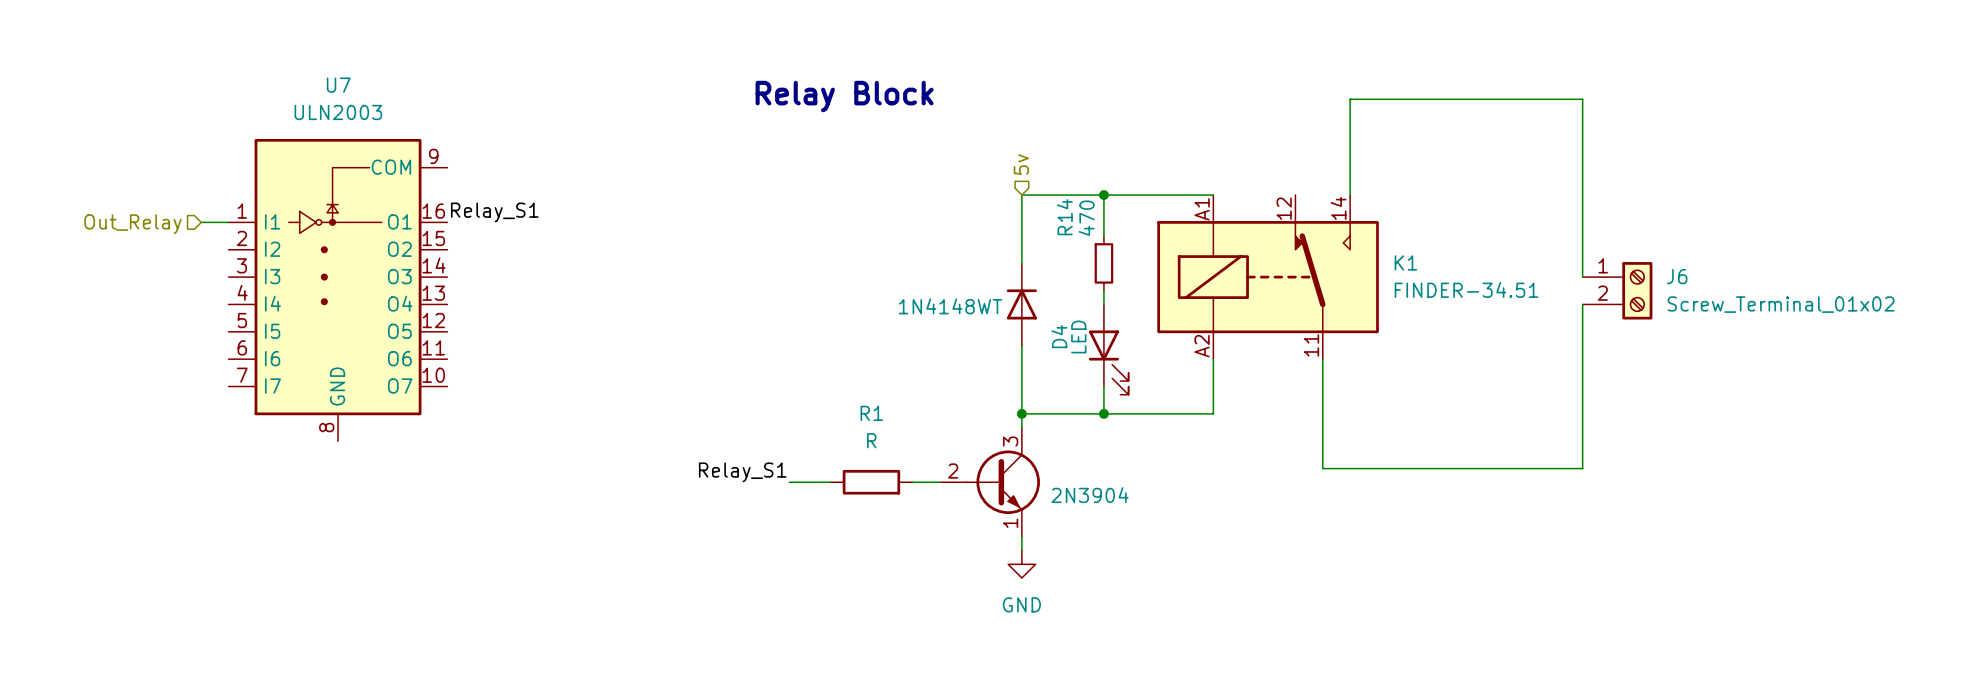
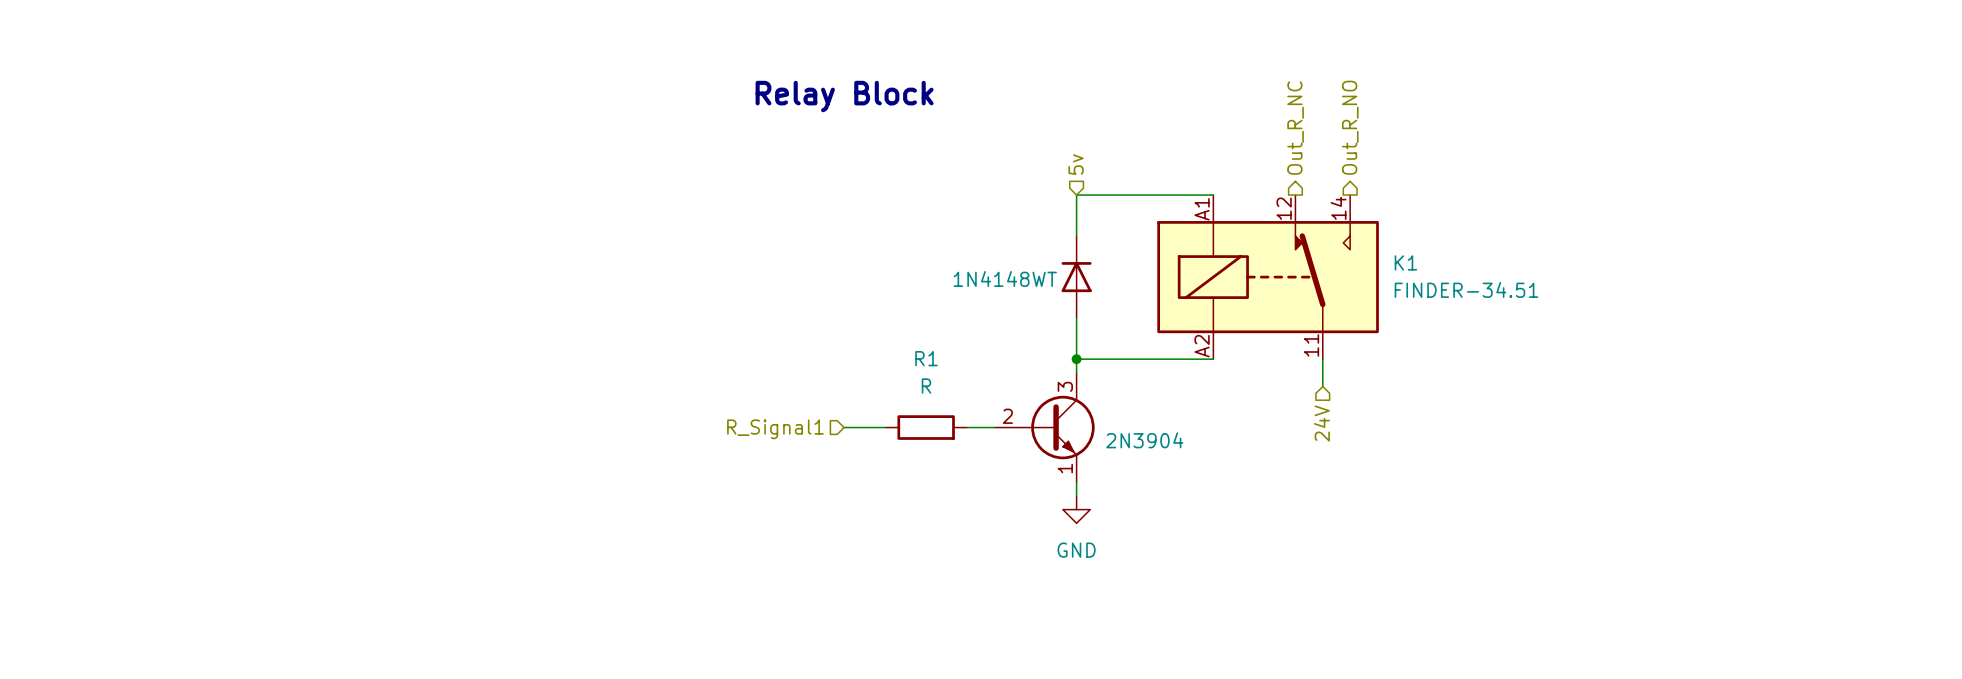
hierarchical label: none -> Out_R_NO (1350, 127)
hierarchical label: none -> Out_R_NC (1295, 128)
hierarchical label position: 5v (1021, 164) -> 5v (1076, 164)
wire: (1076, 195) (1021, 195) (1021, 263) -> (1076, 195) (1076, 236)
wire: (1103, 195) (1103, 236) -> none
junction: (1103, 195) -> none
wire: (1350, 195) (1350, 99) (1582, 99) (1582, 277) -> none
label: Relay_S1 (494, 212) -> none
wire: (201, 222) (228, 222) -> none
hierarchical label: Out_Relay (132, 224) -> none
R14: 470 (1103, 263) -> none
U7: ULN2003 (338, 290) -> none
wire: (1103, 290) (1103, 304) -> none
J6: Screw_Terminal_01x02 (1617, 290) -> none
part position: (1021, 304) -> (1076, 277)
wire: (1582, 304) (1582, 468) (1322, 468) (1322, 386) -> none
wire: none -> (1076, 318) (1076, 372)
wire: (1021, 345) (1021, 427) -> none
D4: LED (1108, 349) -> none
junction: none -> (1076, 359)
wire: (1213, 359) (1213, 413) (1021, 413) -> (1213, 359) (1076, 359)
wire: (1103, 386) (1103, 413) -> none
junction: (1021, 413) -> none
junction: (1103, 413) -> none
hierarchical label: none -> 24V (1321, 423)
hierarchical label: none -> R_Signal1 (775, 429)
label: Relay_S1 (742, 472) -> none
wire: (789, 482) (830, 482) -> (844, 427) (885, 427)
R1 position: (871, 482) -> (926, 427)
wire: (912, 482) (939, 482) -> (967, 427) (994, 427)
part position: (989, 482) -> (1044, 427)
wire: (1021, 536) (1021, 550) -> (1076, 482) (1076, 495)
power symbol position: GND (1021, 564) -> GND (1076, 509)

